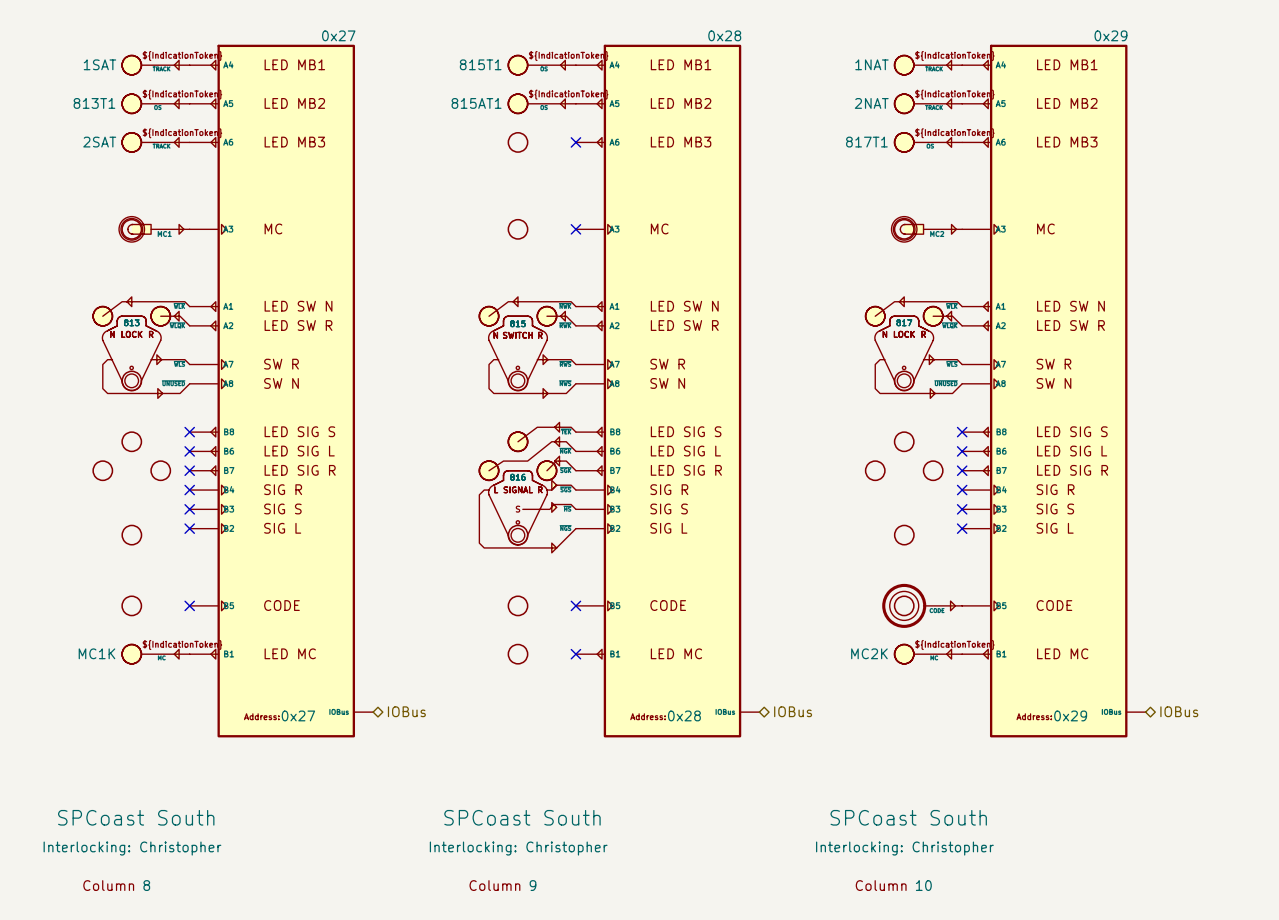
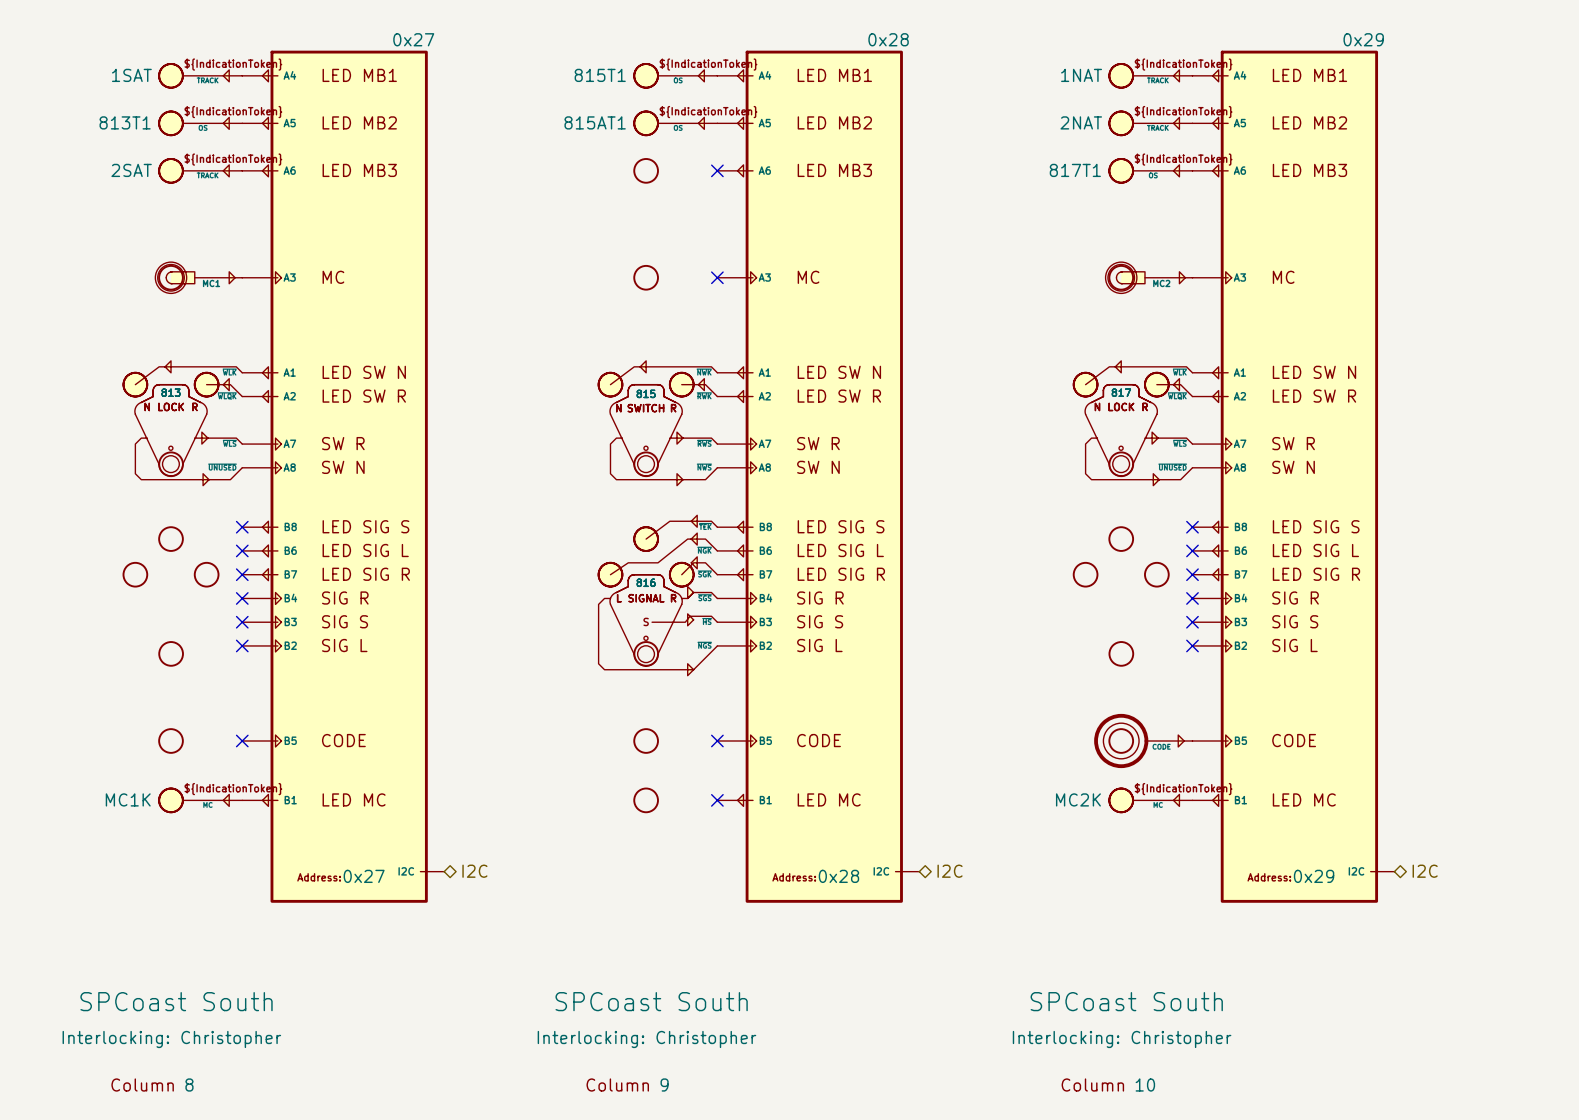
part: none -> 0x27 (343, 476)
part: 0x27 (281, 391) -> none
part: none -> 0x28 (818, 476)
part: 0x28 (667, 391) -> none
part: none -> 0x29 (1293, 476)
part: 0x29 (1053, 391) -> none
hierarchical label: none -> I2C (474, 871)
hierarchical label: IOBus (406, 711) -> none
hierarchical label: none -> I2C (950, 871)
hierarchical label: IOBus (793, 711) -> none
hierarchical label: none -> I2C (1425, 871)
hierarchical label: IOBus (1179, 711) -> none

